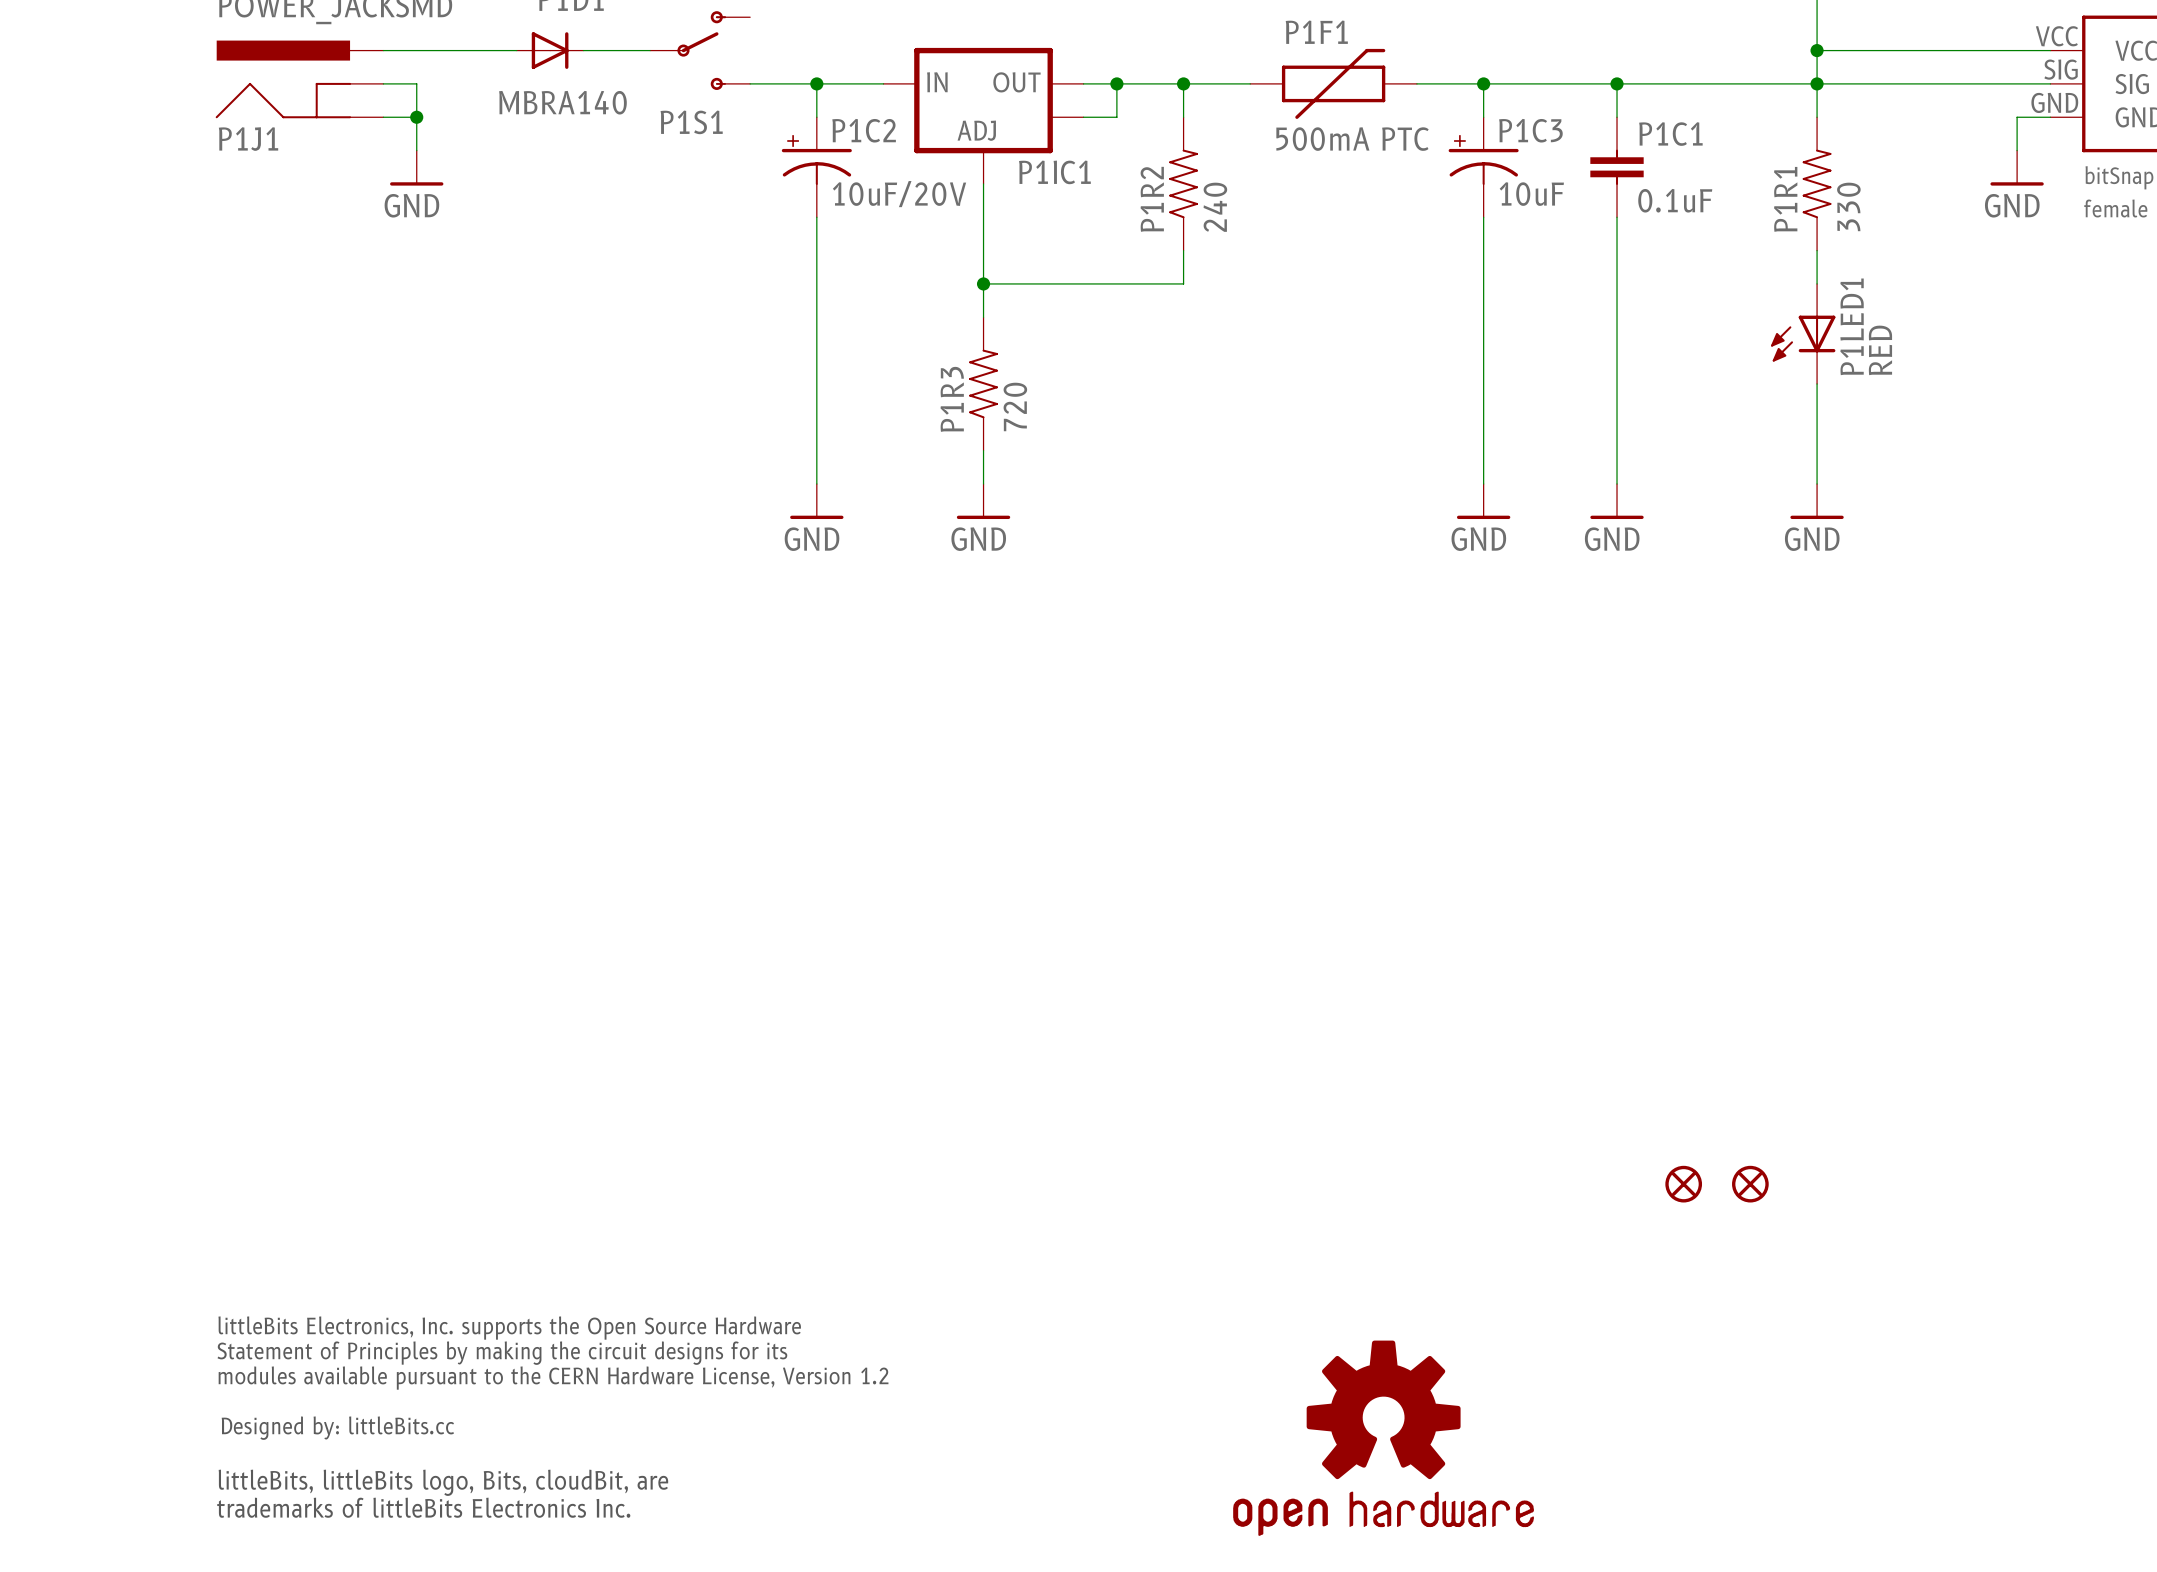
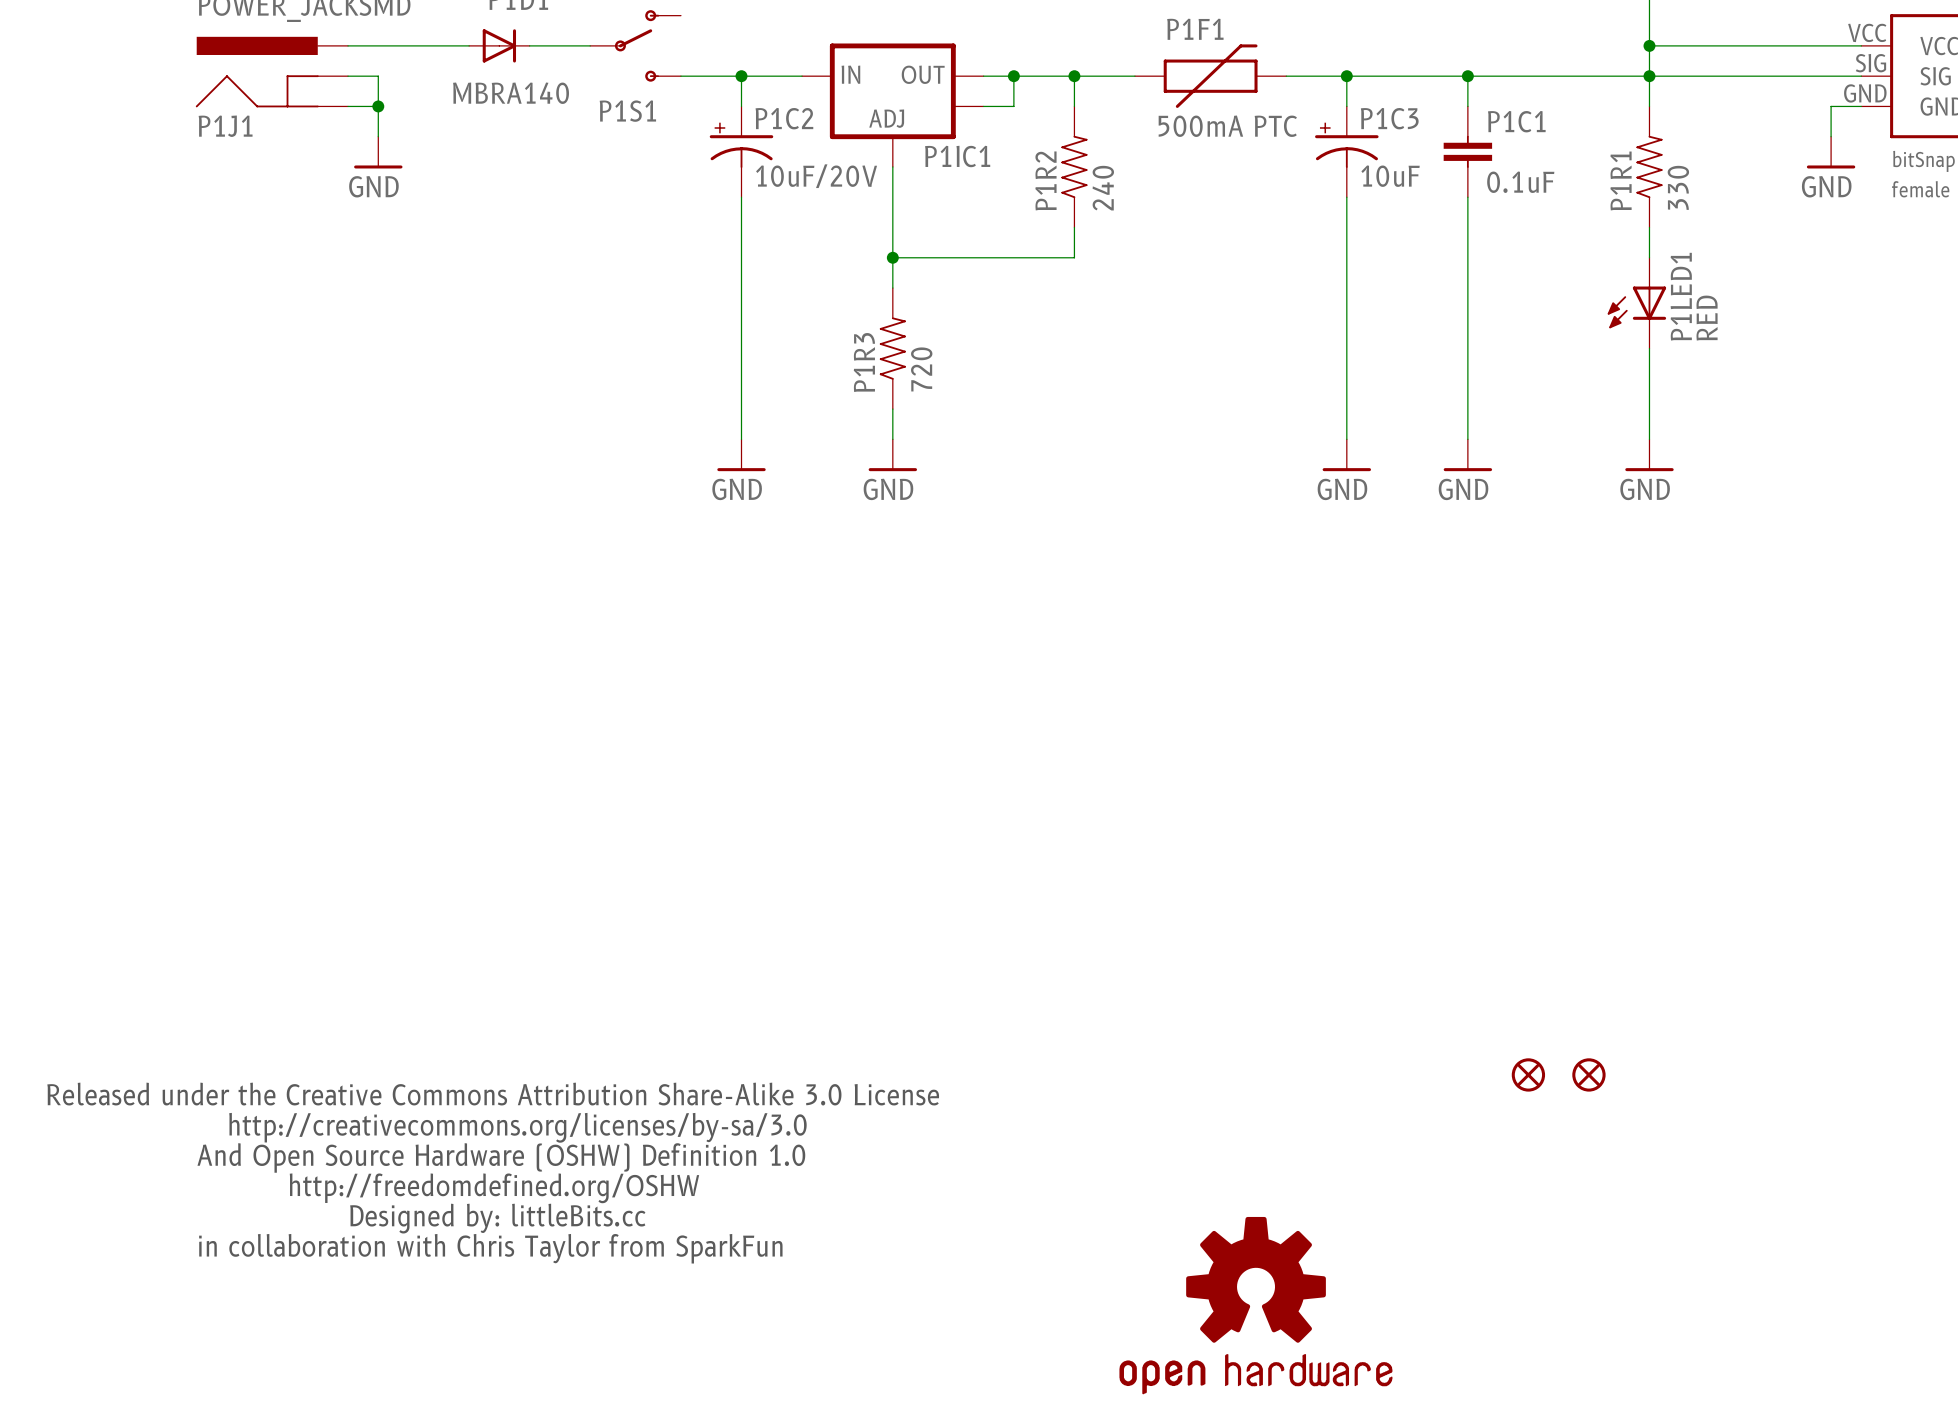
part: none -> (493, 1173)
part: (552, 1417) -> none

